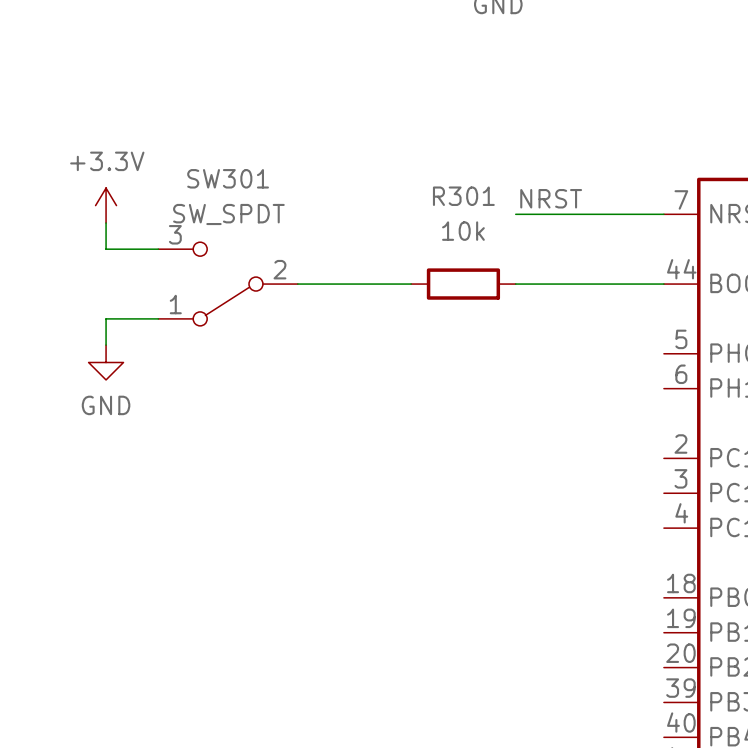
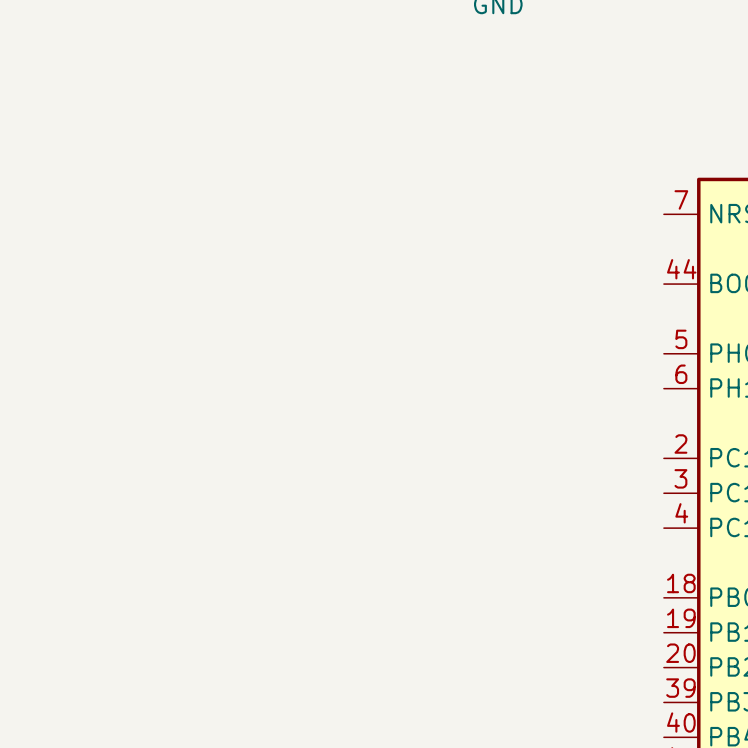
label: NRST (551, 198) -> none
power symbol: +3.3V (106, 205) -> none
wire: (515, 214) (663, 214) -> none
wire: (106, 223) (106, 249) (158, 249) -> none
SW301: SW_SPDT (228, 284) -> none
wire: (297, 284) (411, 284) -> none
R301: 10k (463, 284) -> none
wire: (515, 284) (663, 284) -> none
wire: (158, 318) (106, 318) (106, 345) -> none
power symbol: GND (106, 362) -> none

